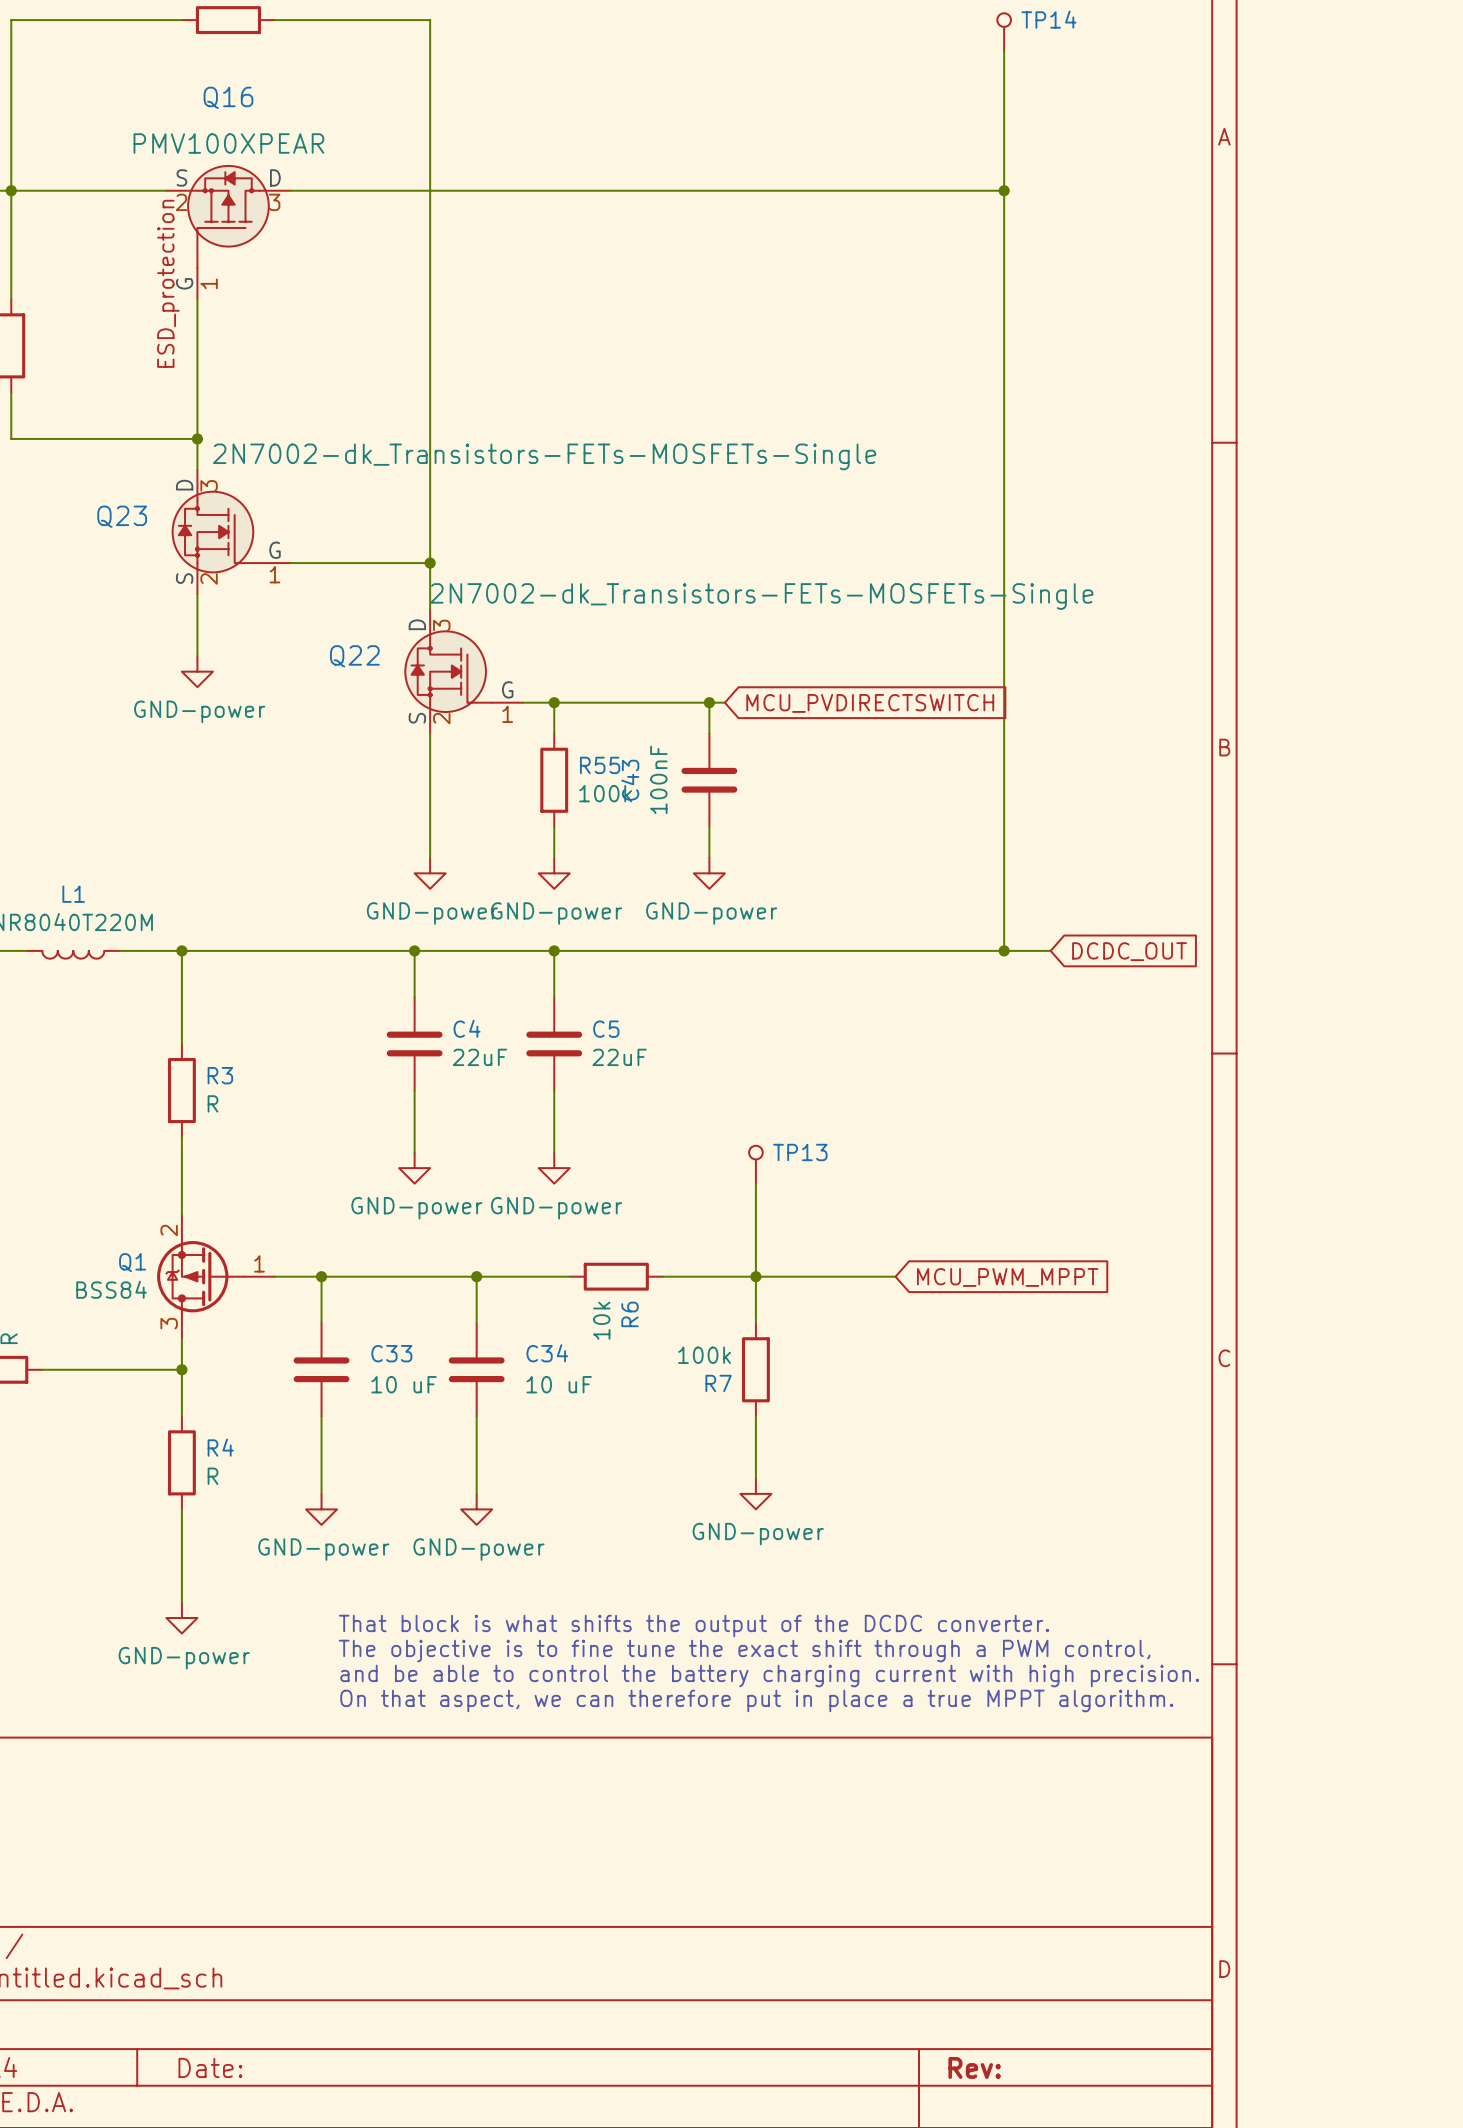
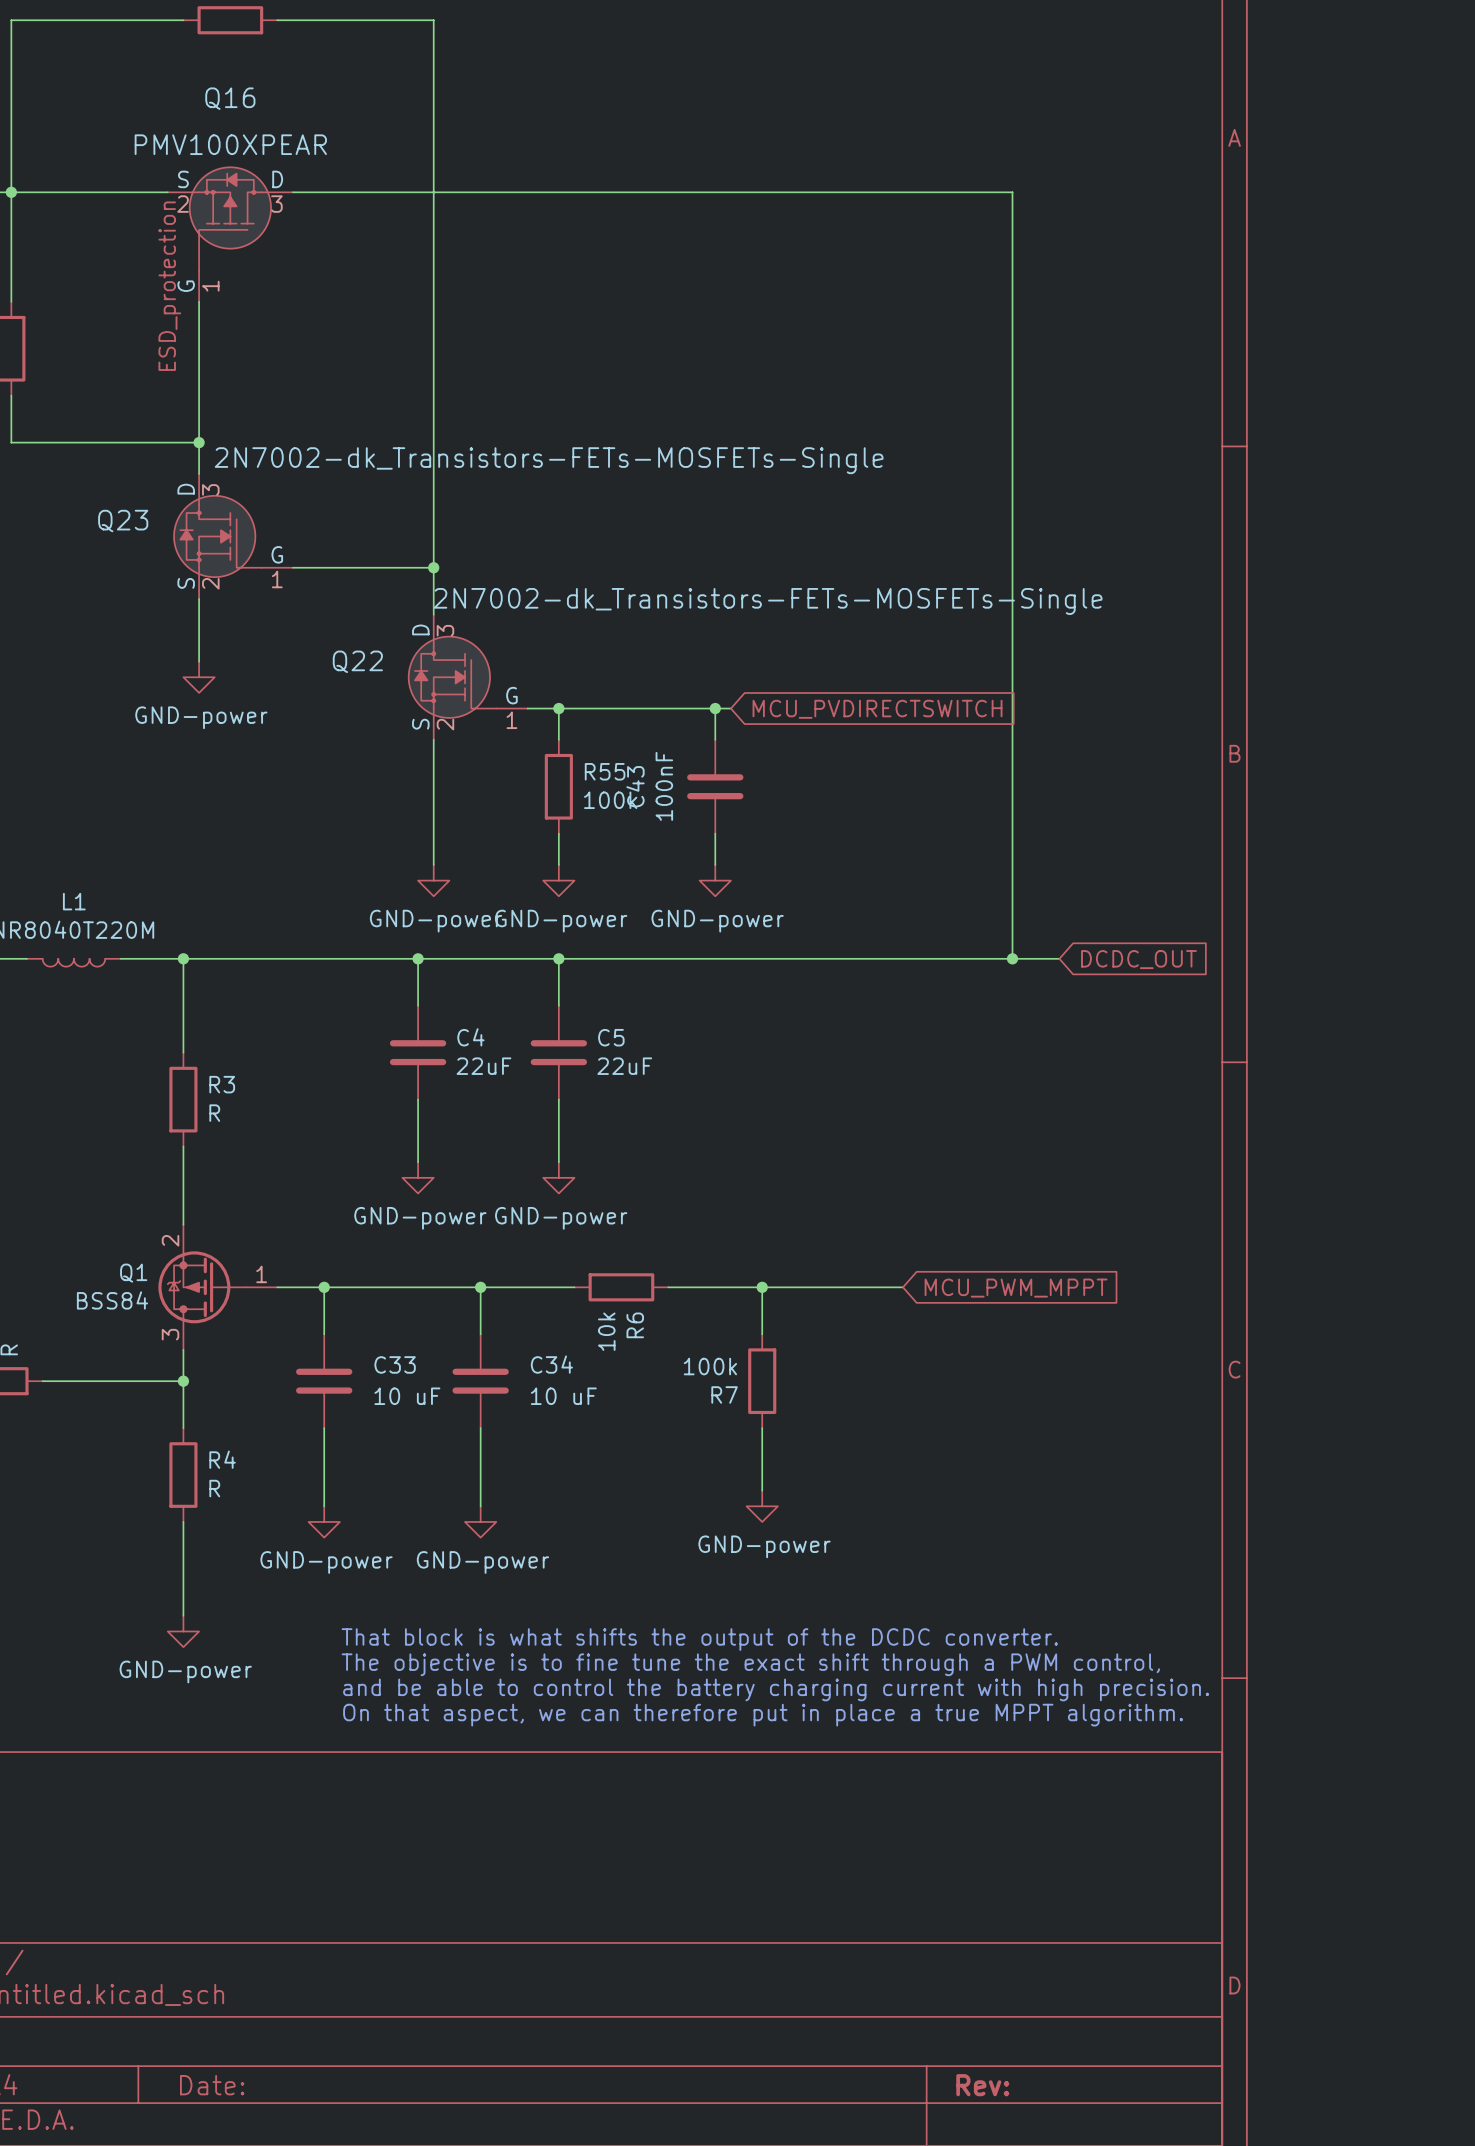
TP14: (1004, 32) -> none
wire: (1004, 51) (1004, 190) -> none
junction: (1004, 190) -> none
TP13: (755, 1164) -> none
wire: (755, 1183) (755, 1276) -> none

